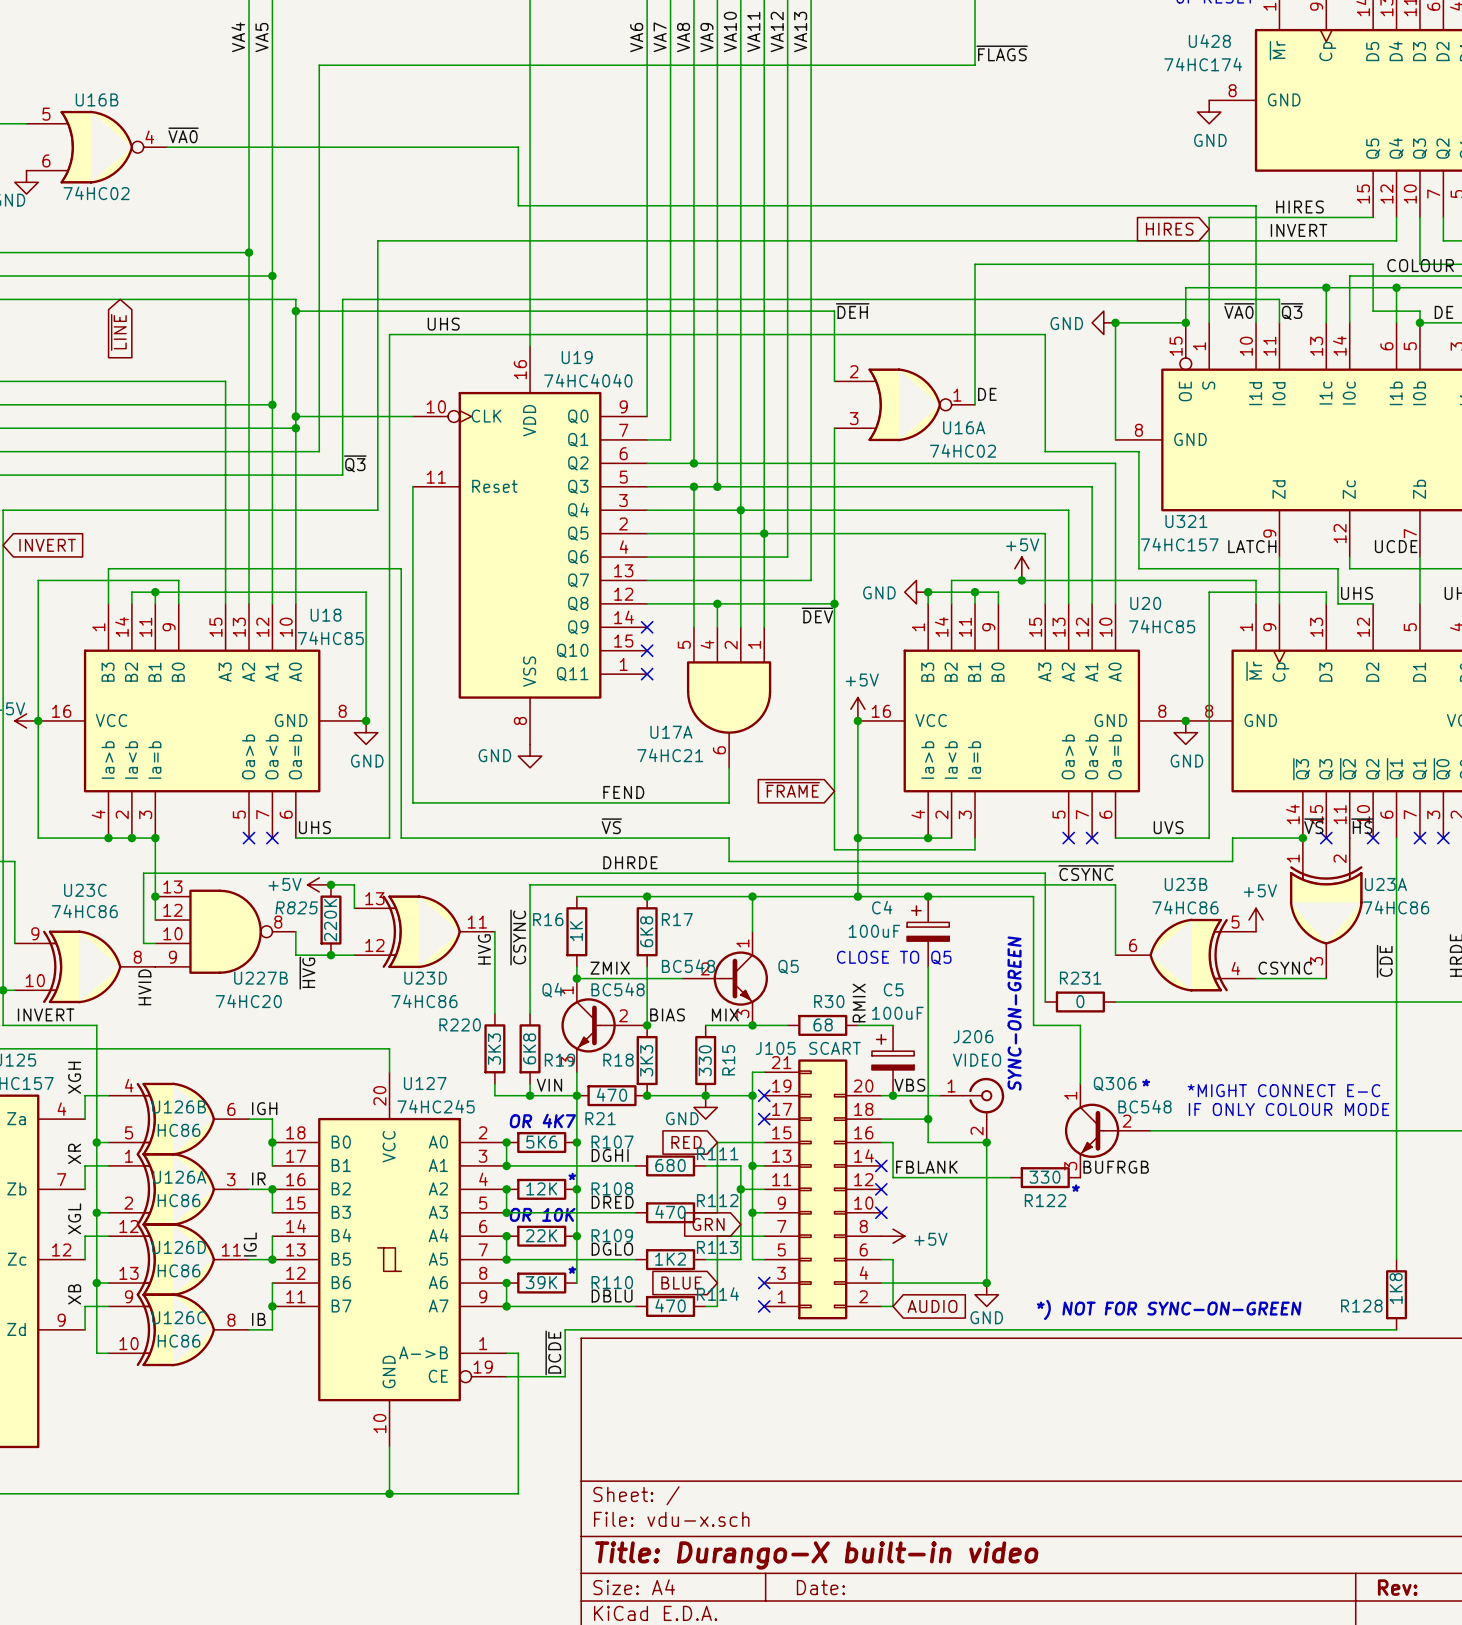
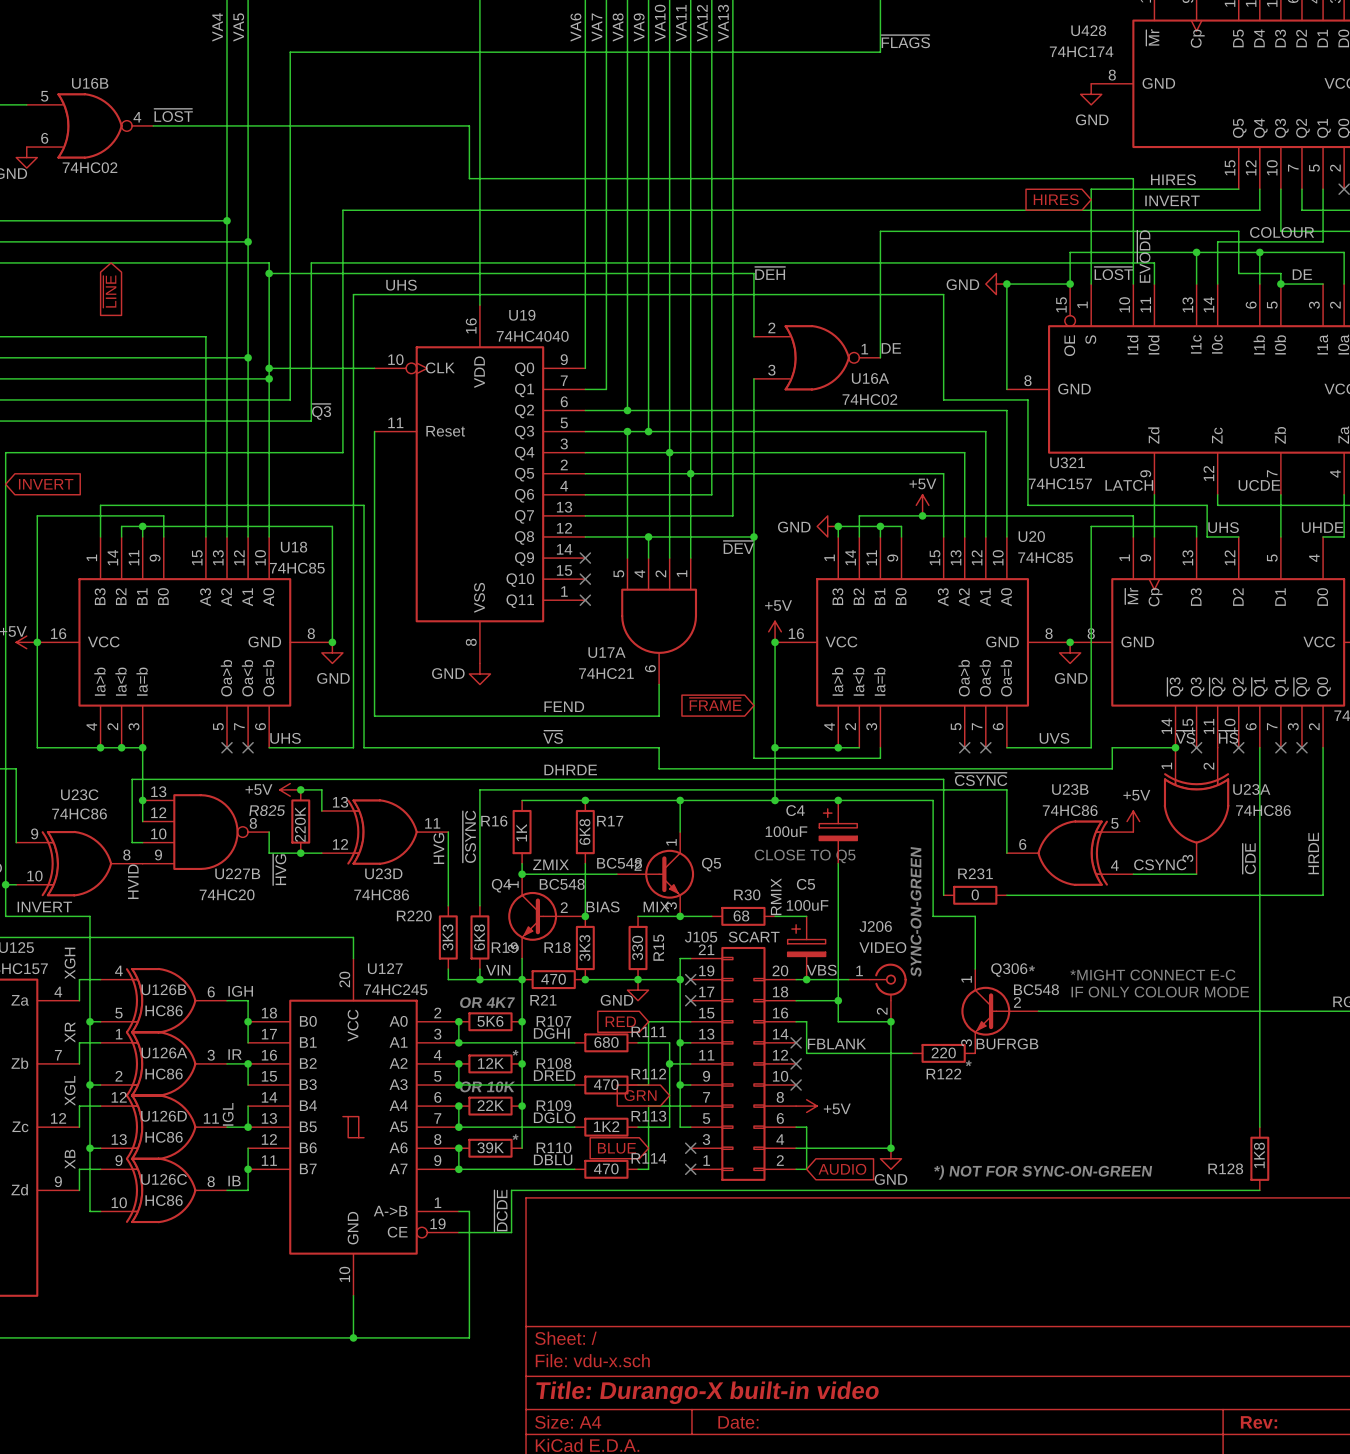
label: ~{VA0} (183, 135) -> ~{LOST} (173, 115)
label: ~{VA0} (1239, 311) -> ~{LOST} (1113, 273)
label: ~{Q3} (1292, 311) -> EV~{ODD} (1143, 256)
R122 value: 330 (1044, 1177) -> 220 (943, 1052)

